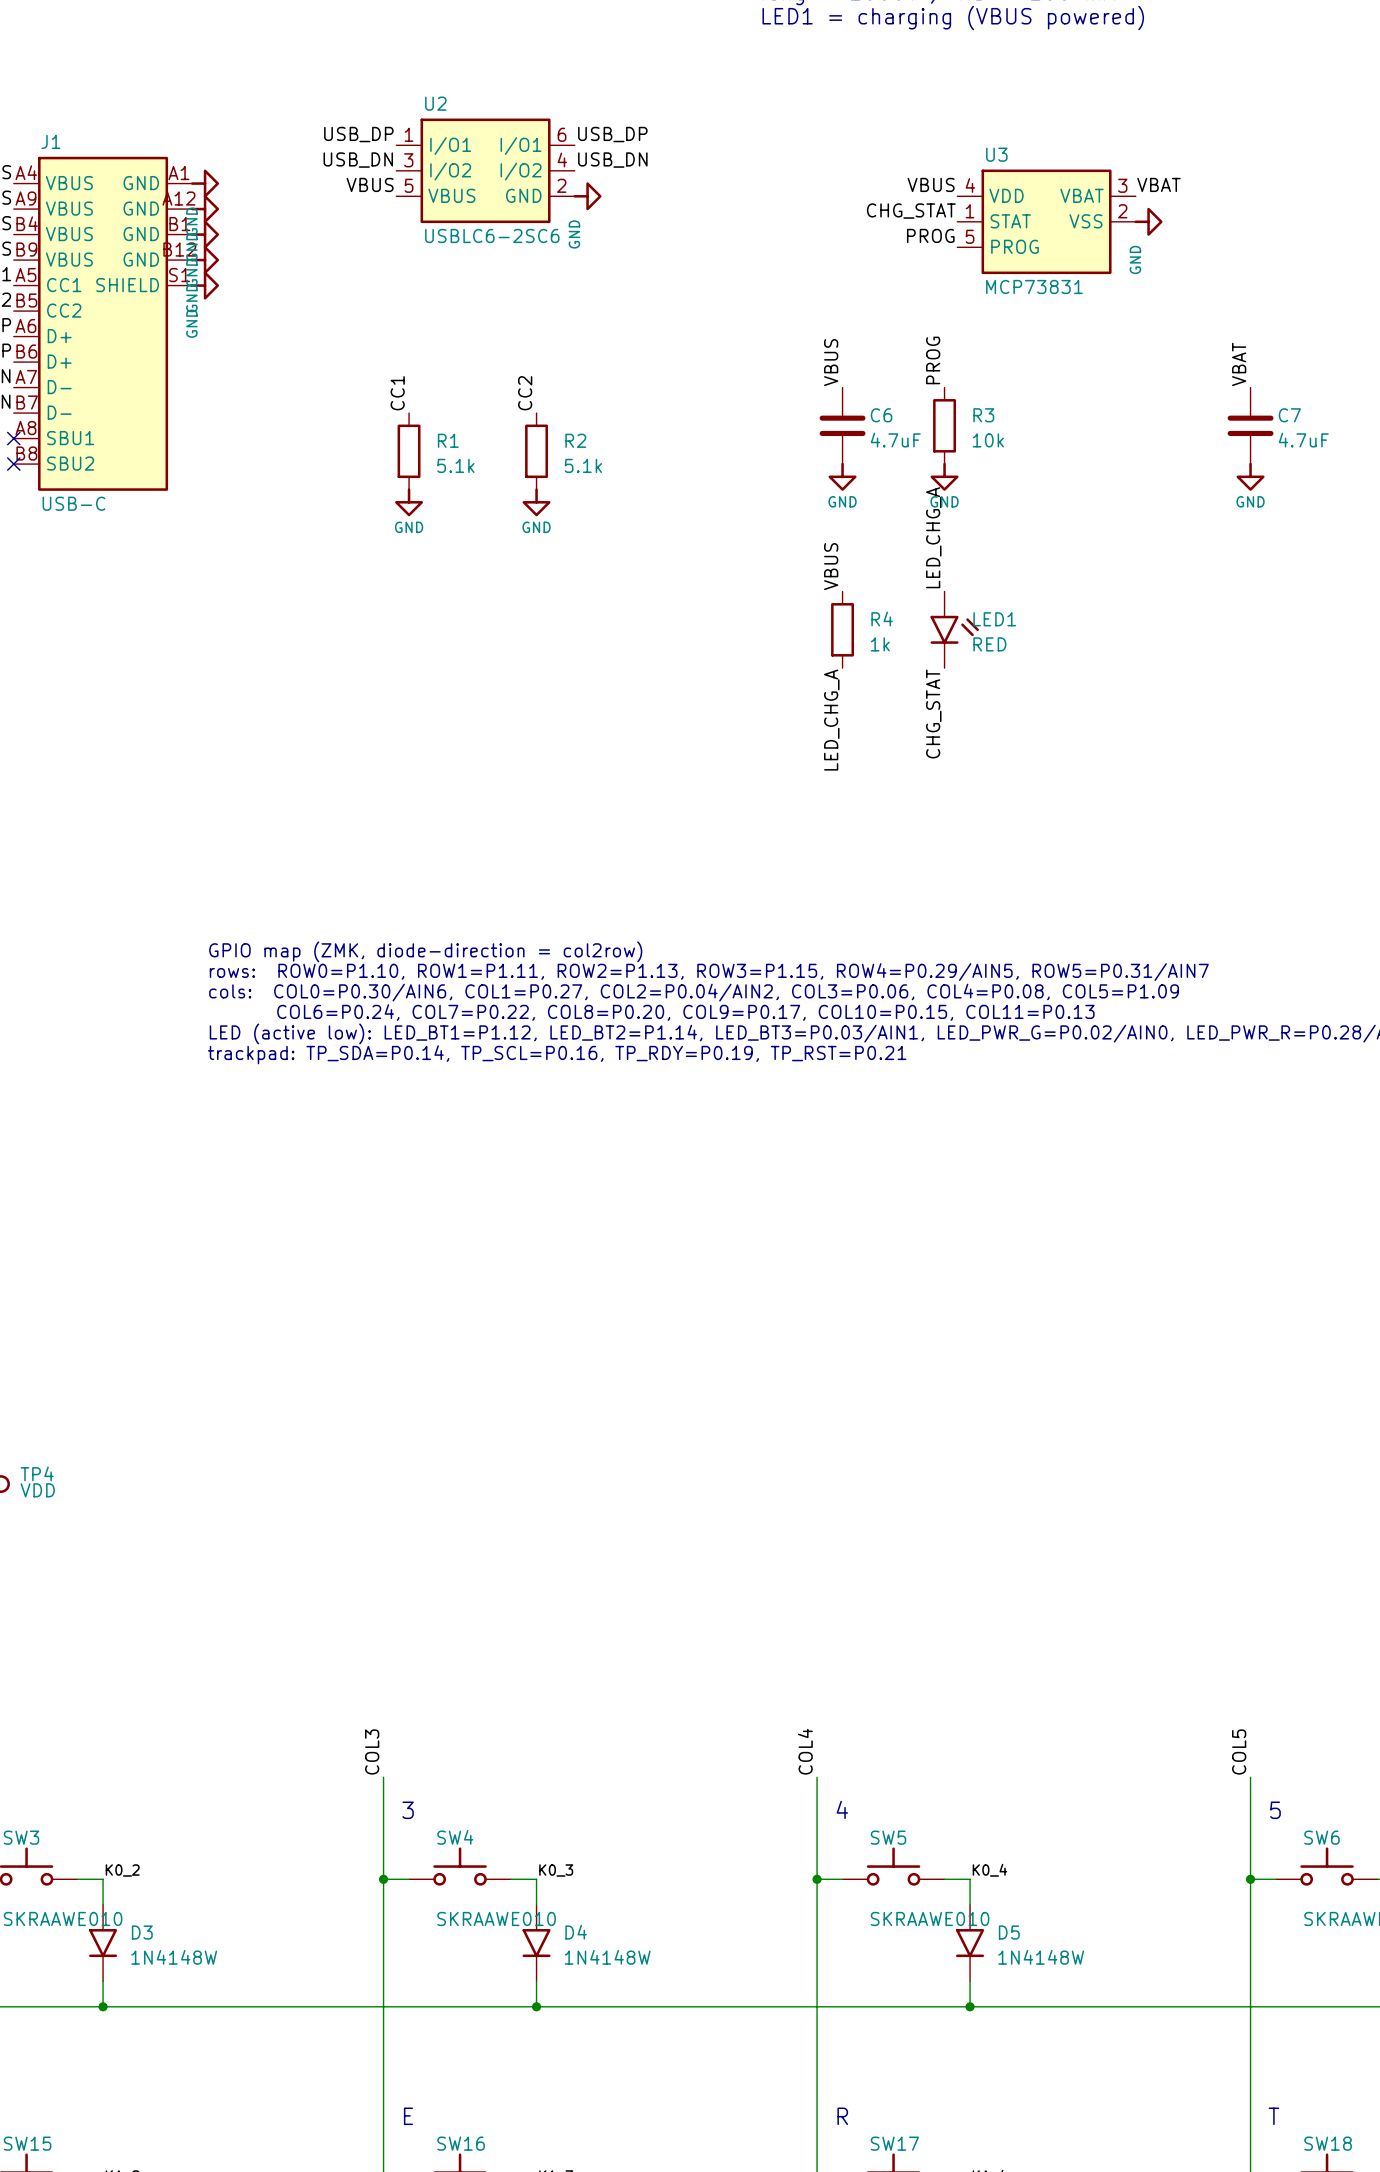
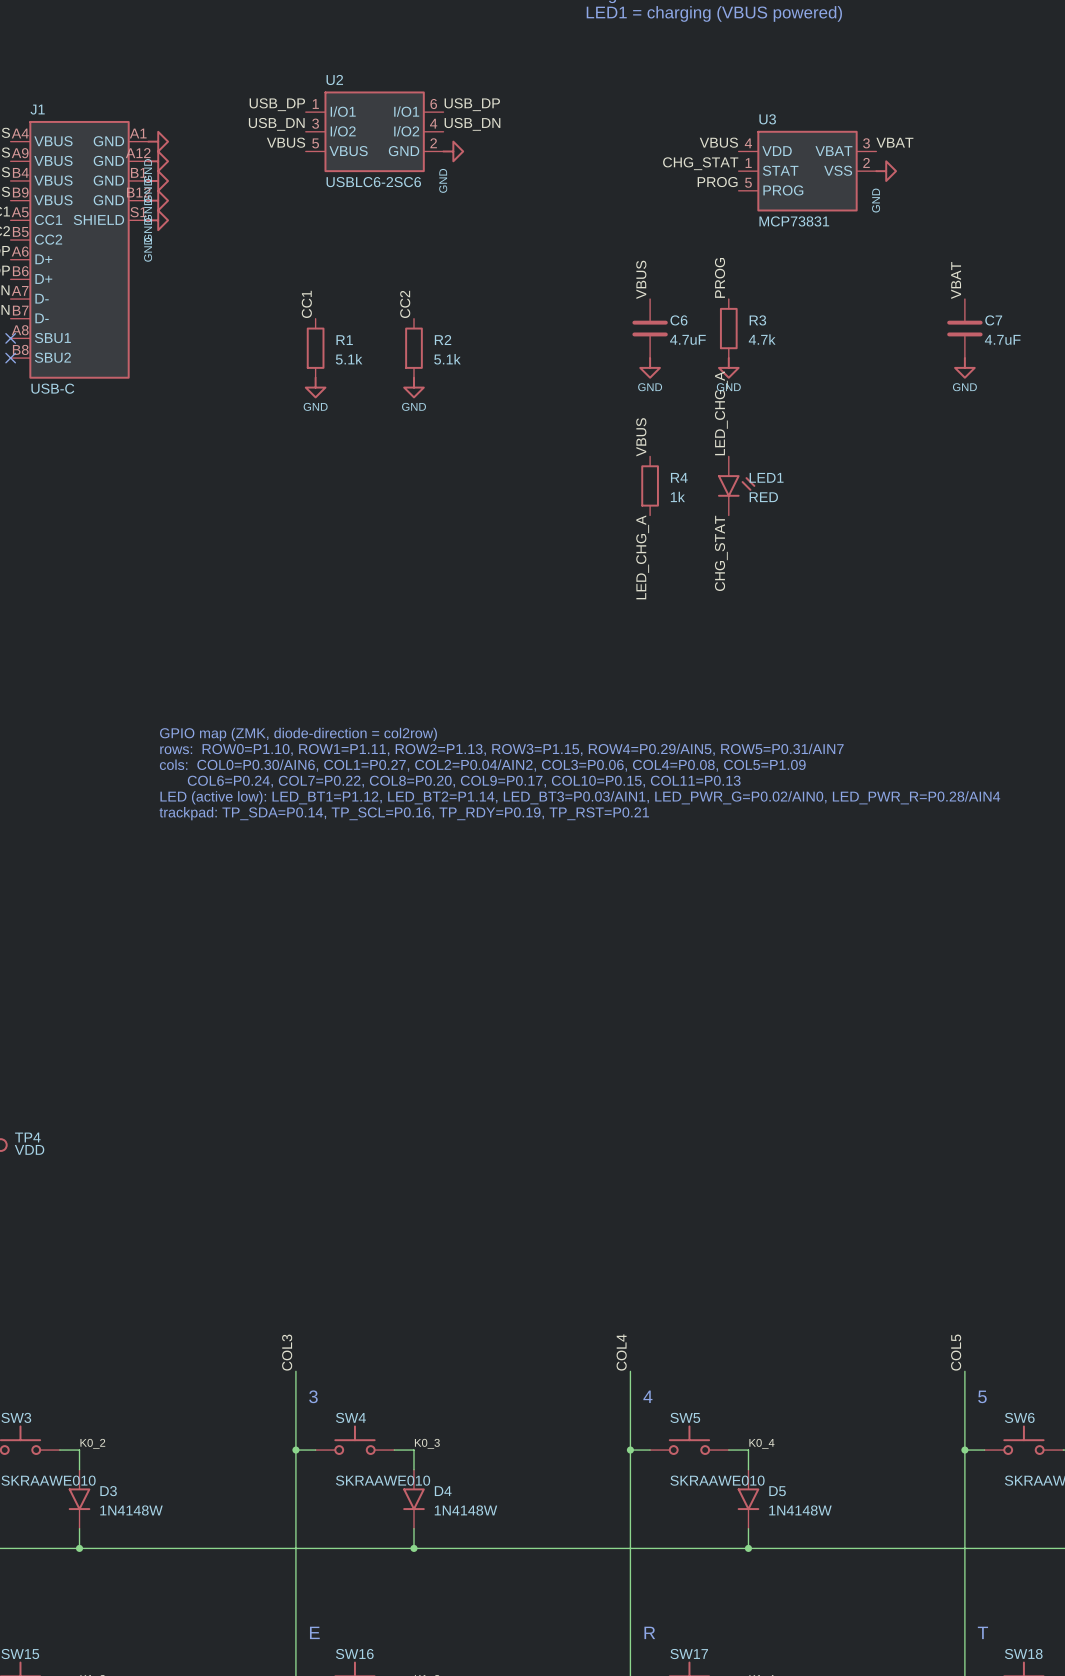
R3 value: 10k (988, 440) -> 4.7k (762, 339)

